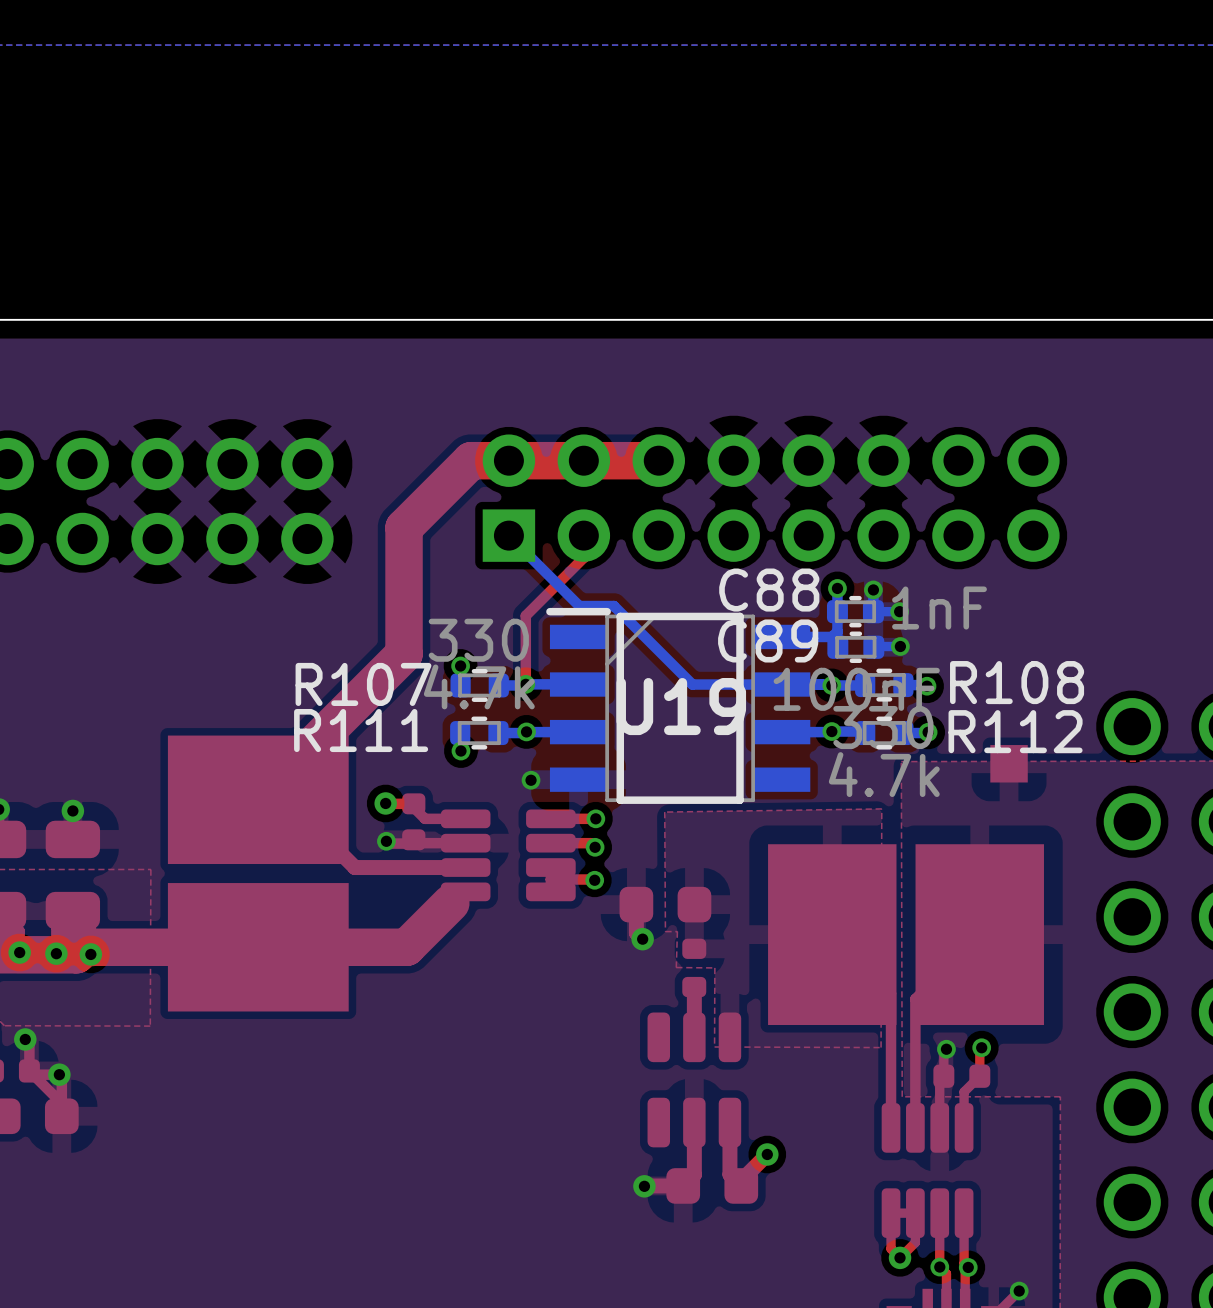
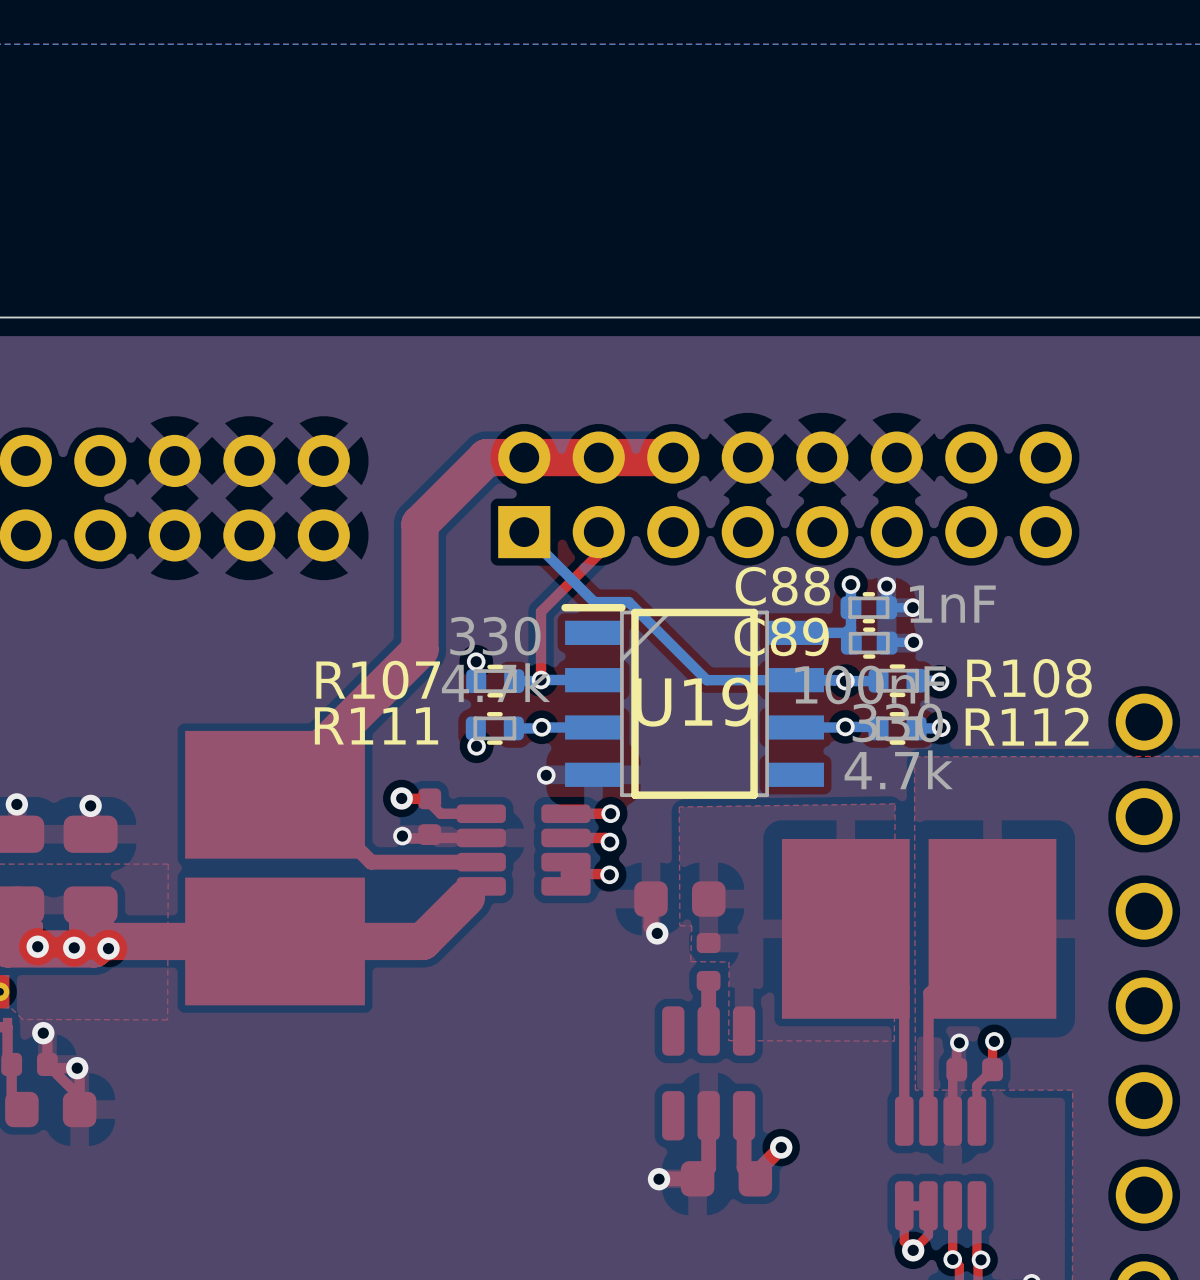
part: (1009, 763) -> none

